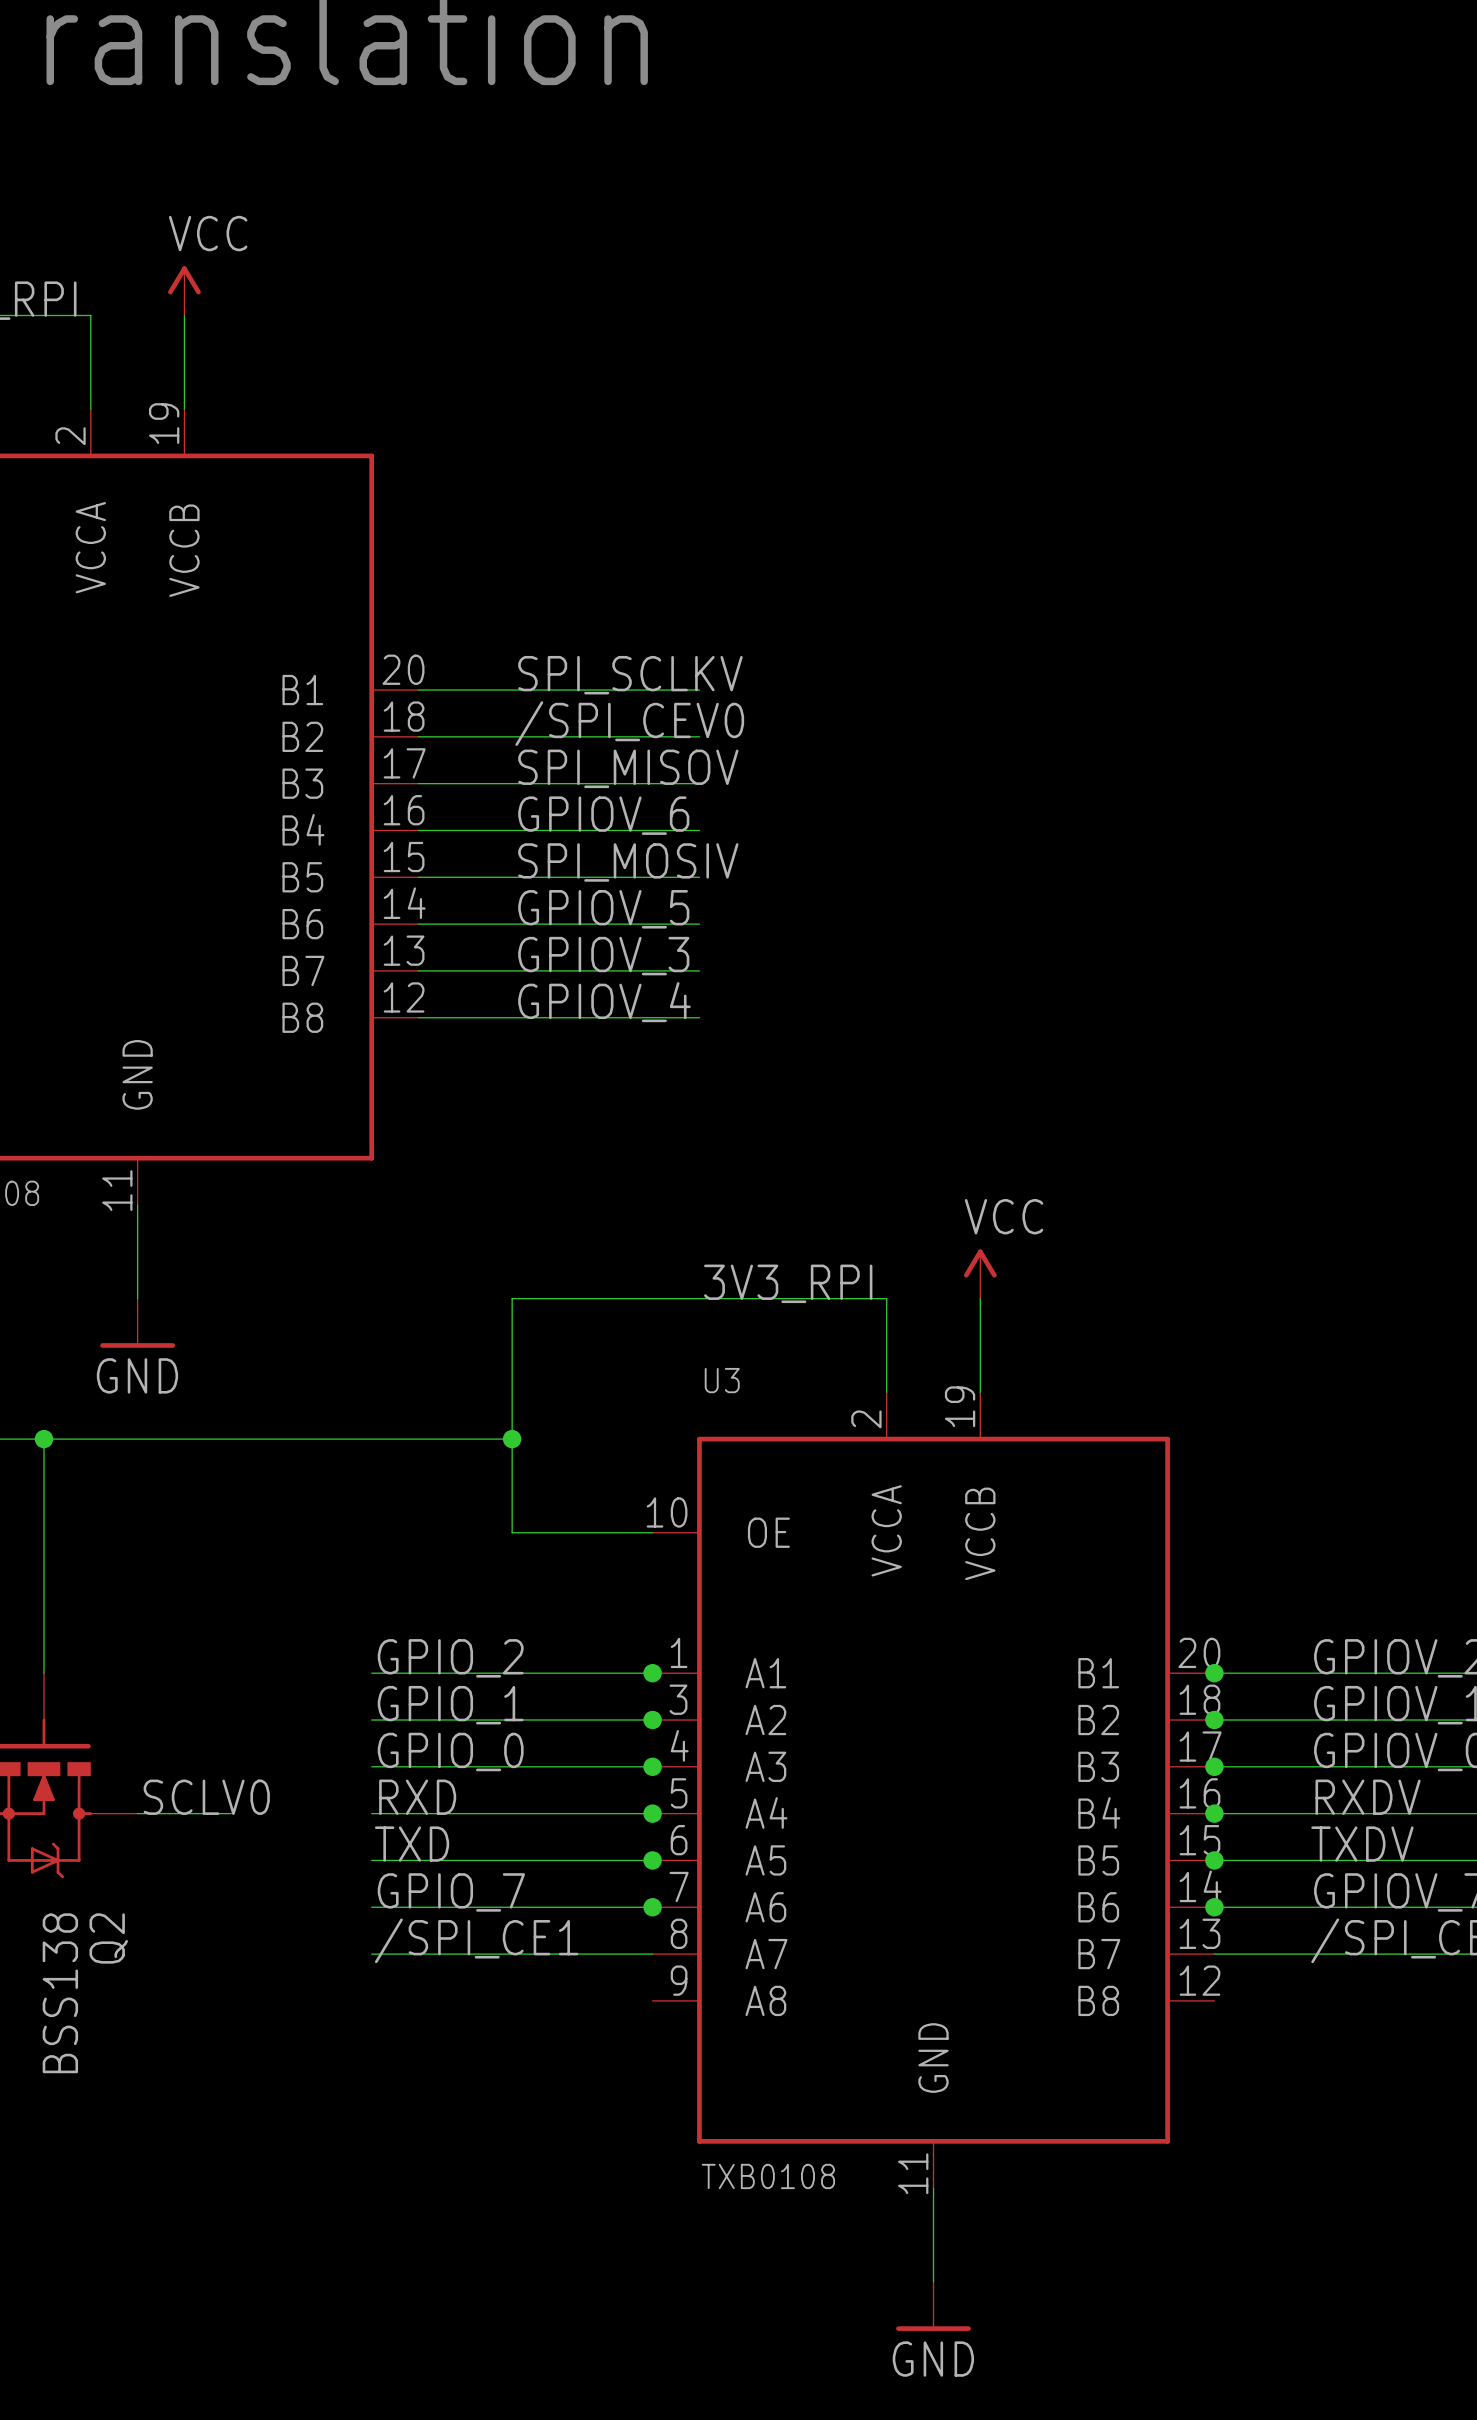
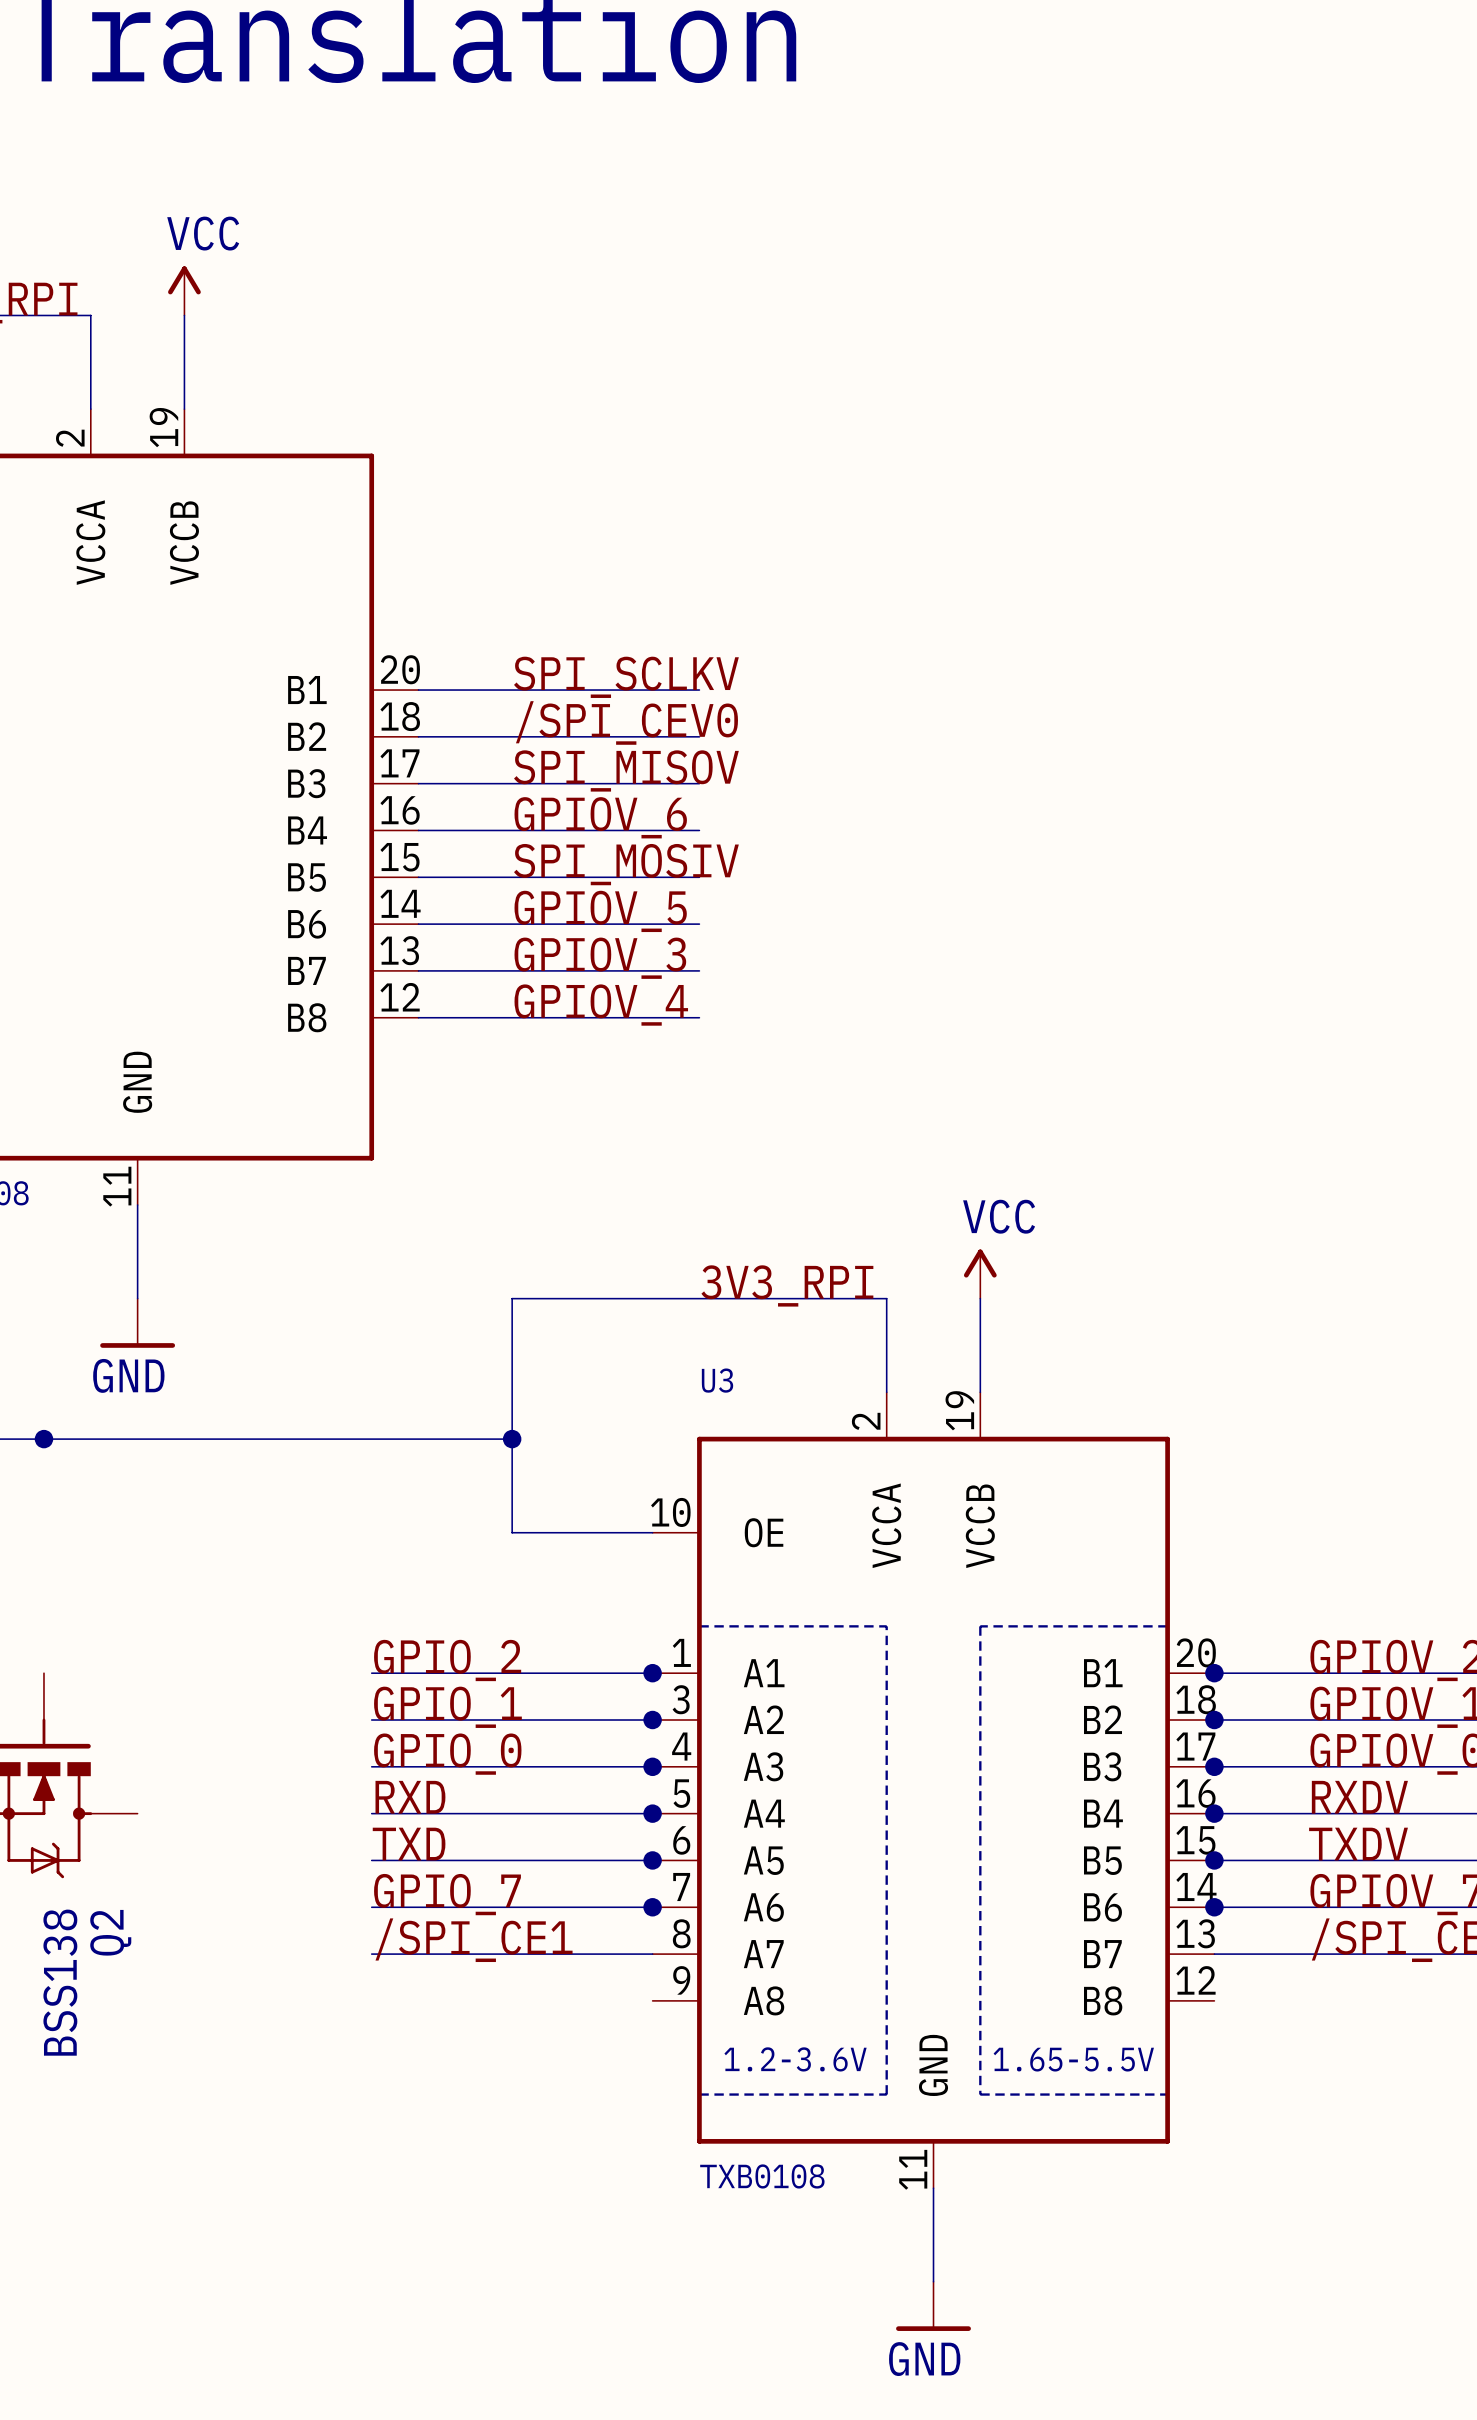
U3 symbol: [652, 1392, 1215, 2189] -> [652, 1392, 1215, 2189]
wire: (43, 1439) (43, 1673) -> none
label: SCLV0 (206, 1797) -> none
wire: (137, 1813) (231, 1813) -> none

